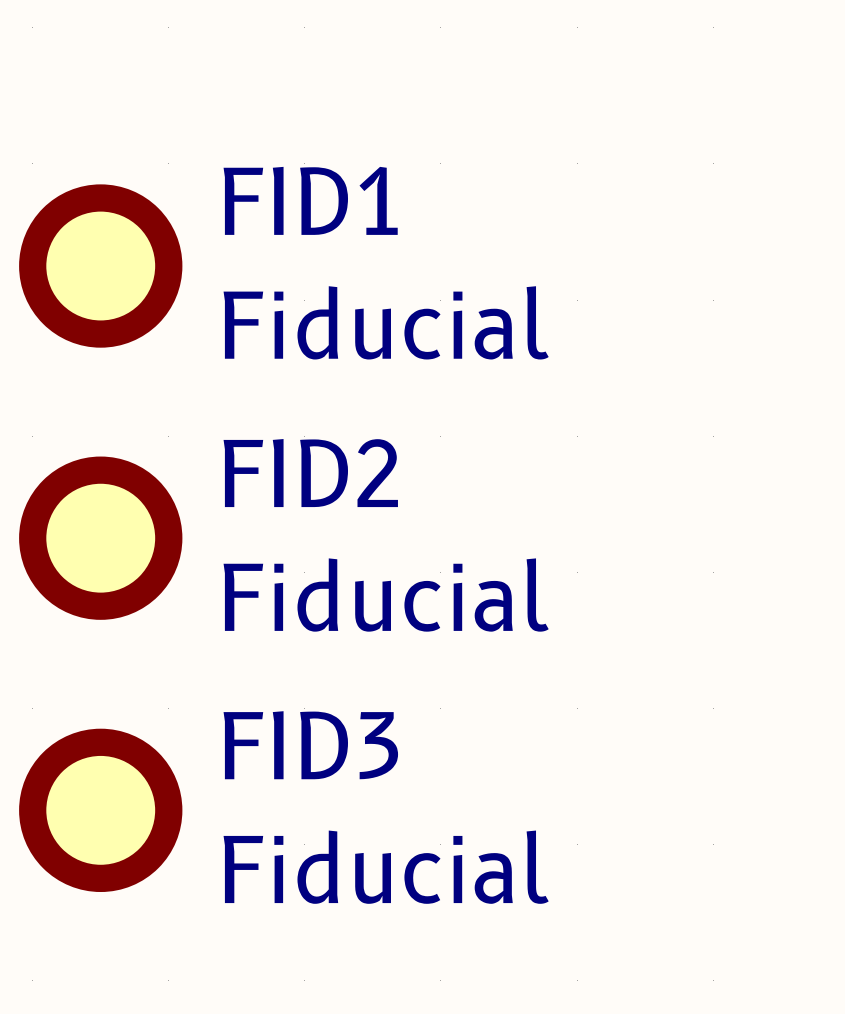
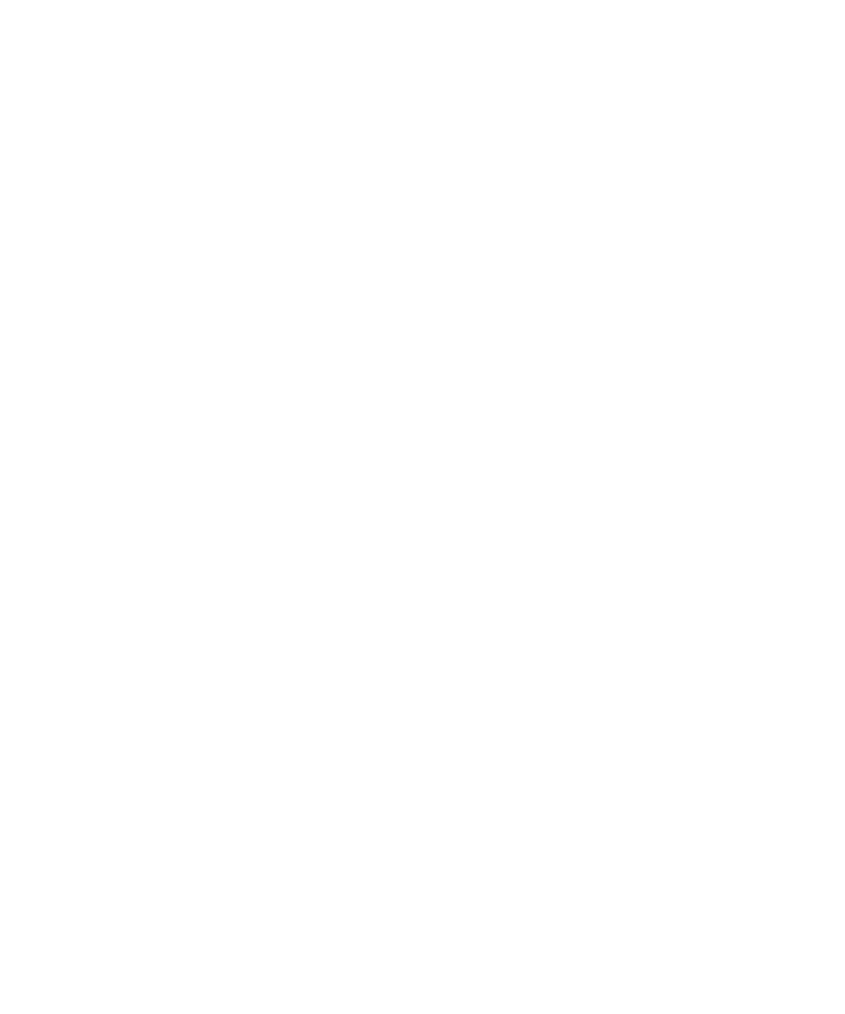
FID1: Fiducial (100, 266) -> none
FID2: Fiducial (100, 538) -> none
FID3: Fiducial (100, 810) -> none

